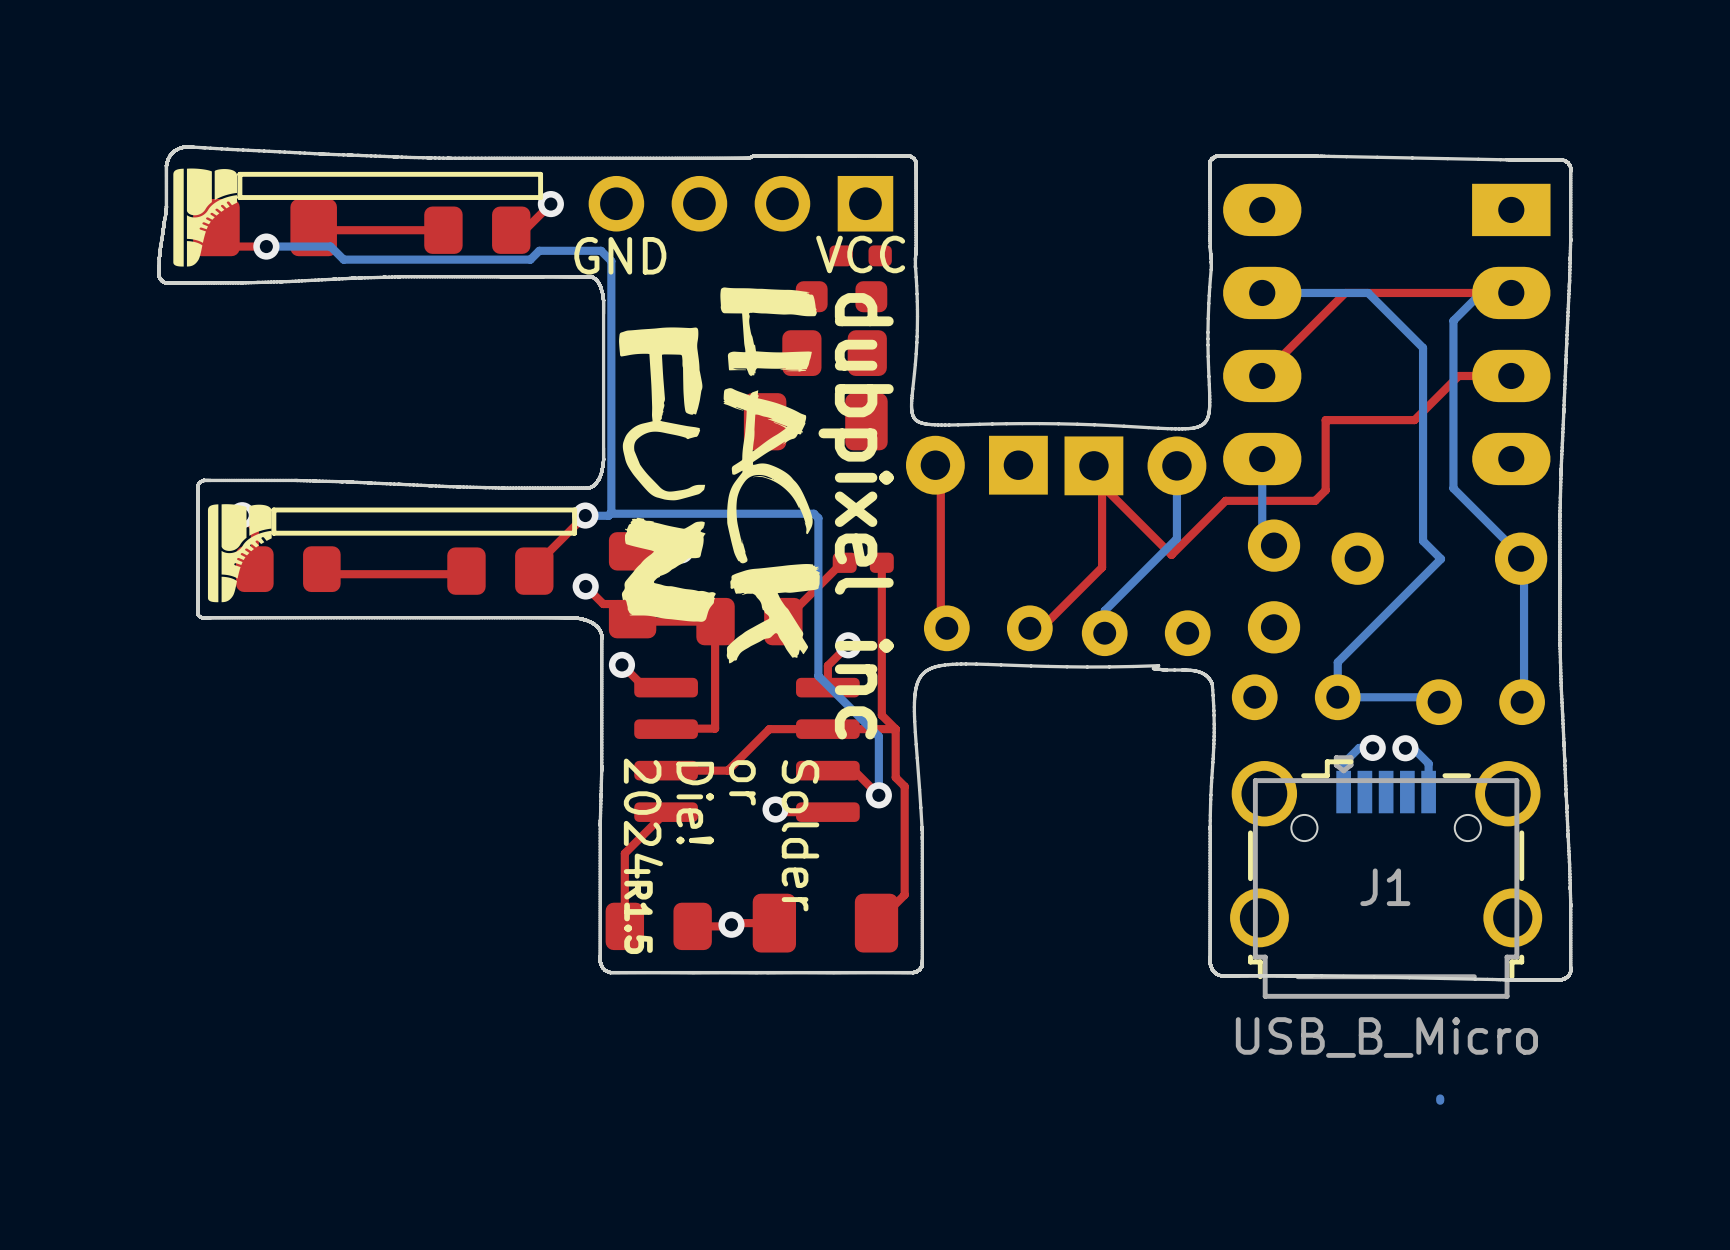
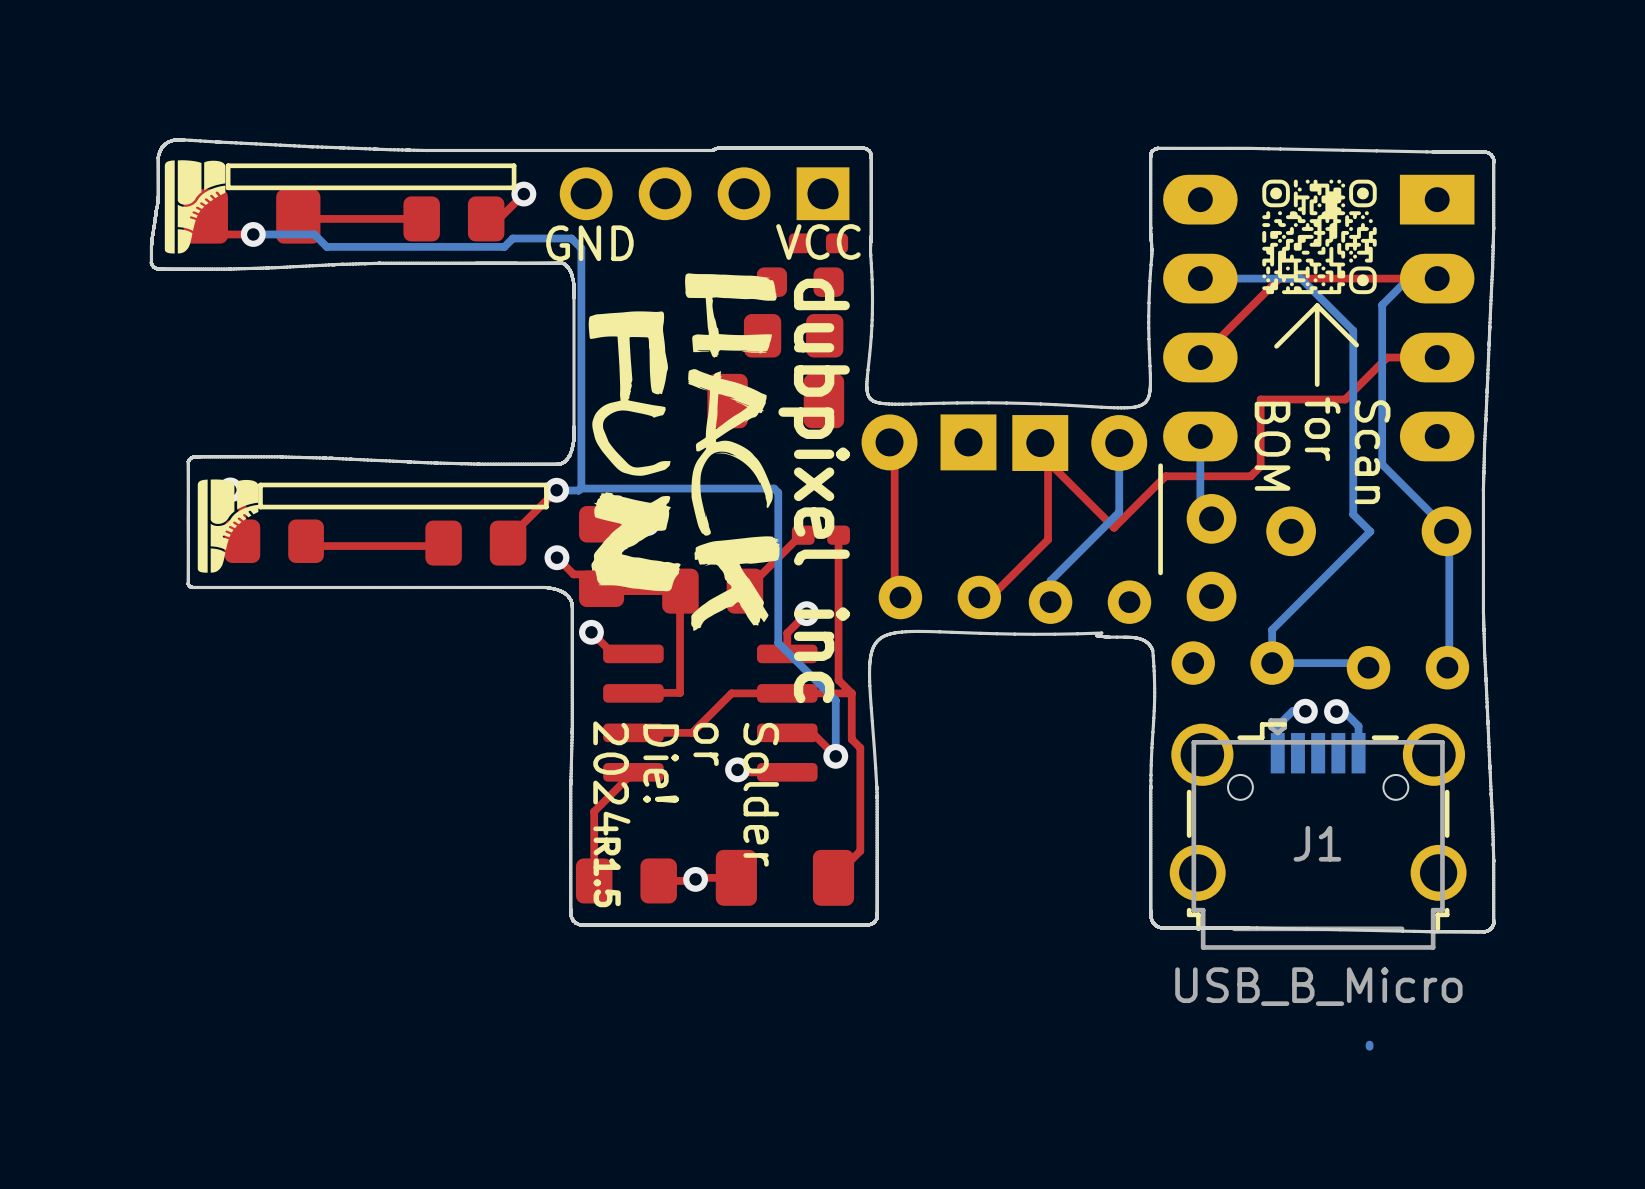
drawing: none -> [1262, 179, 1377, 295]
line: none -> (1317, 305) (1356, 345)
line: none -> (1317, 305) (1276, 346)
line: none -> (1317, 305) (1317, 384)
text: none -> for (1322, 429)
text: none -> BOM (1272, 446)
text: none -> Scan (1372, 452)
line: none -> (1160, 465) (1160, 572)

